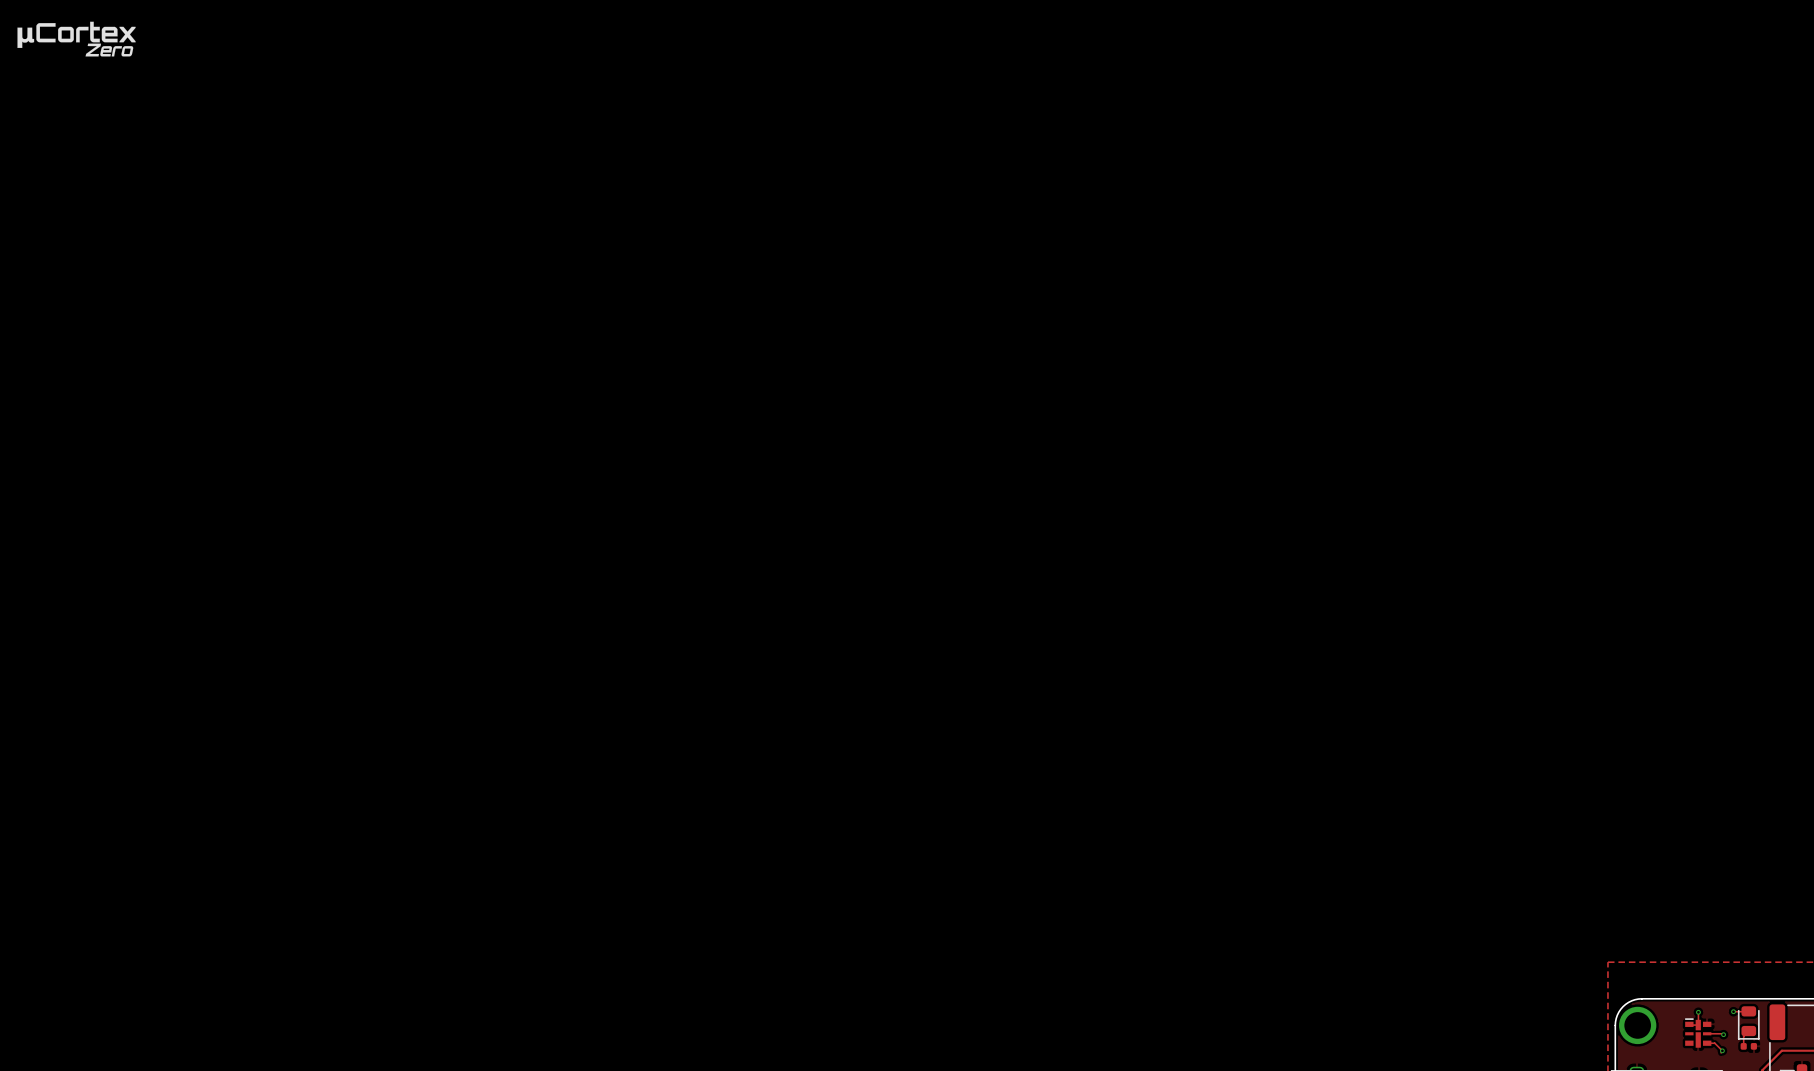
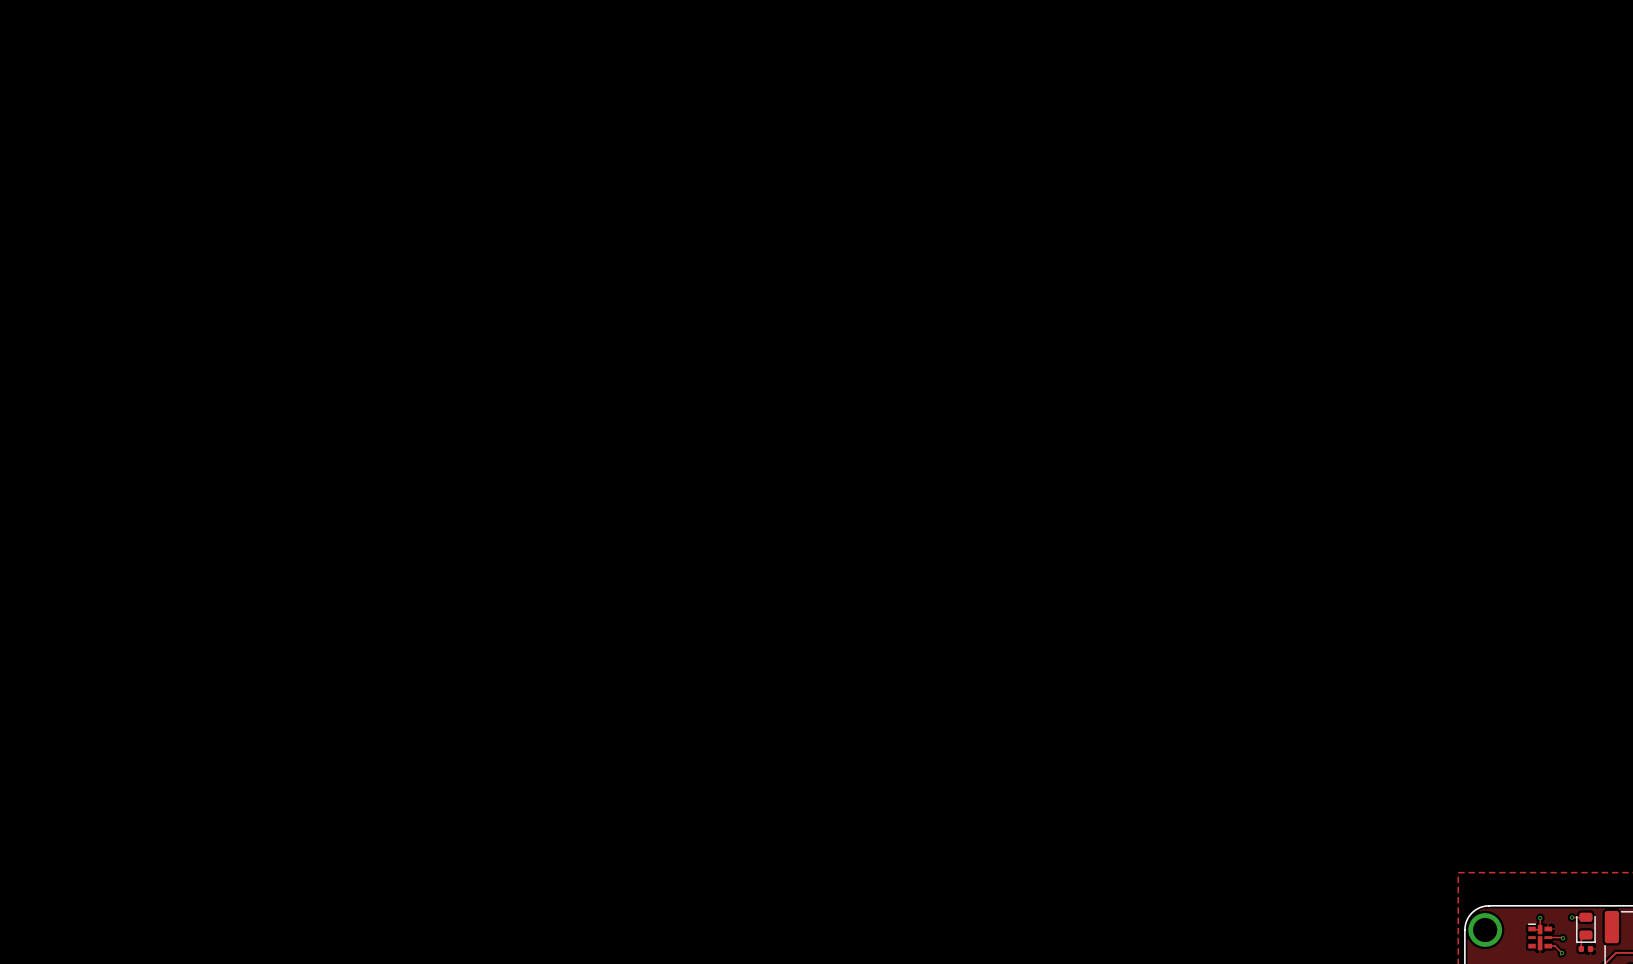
drawing: [17, 21, 136, 57] -> none

